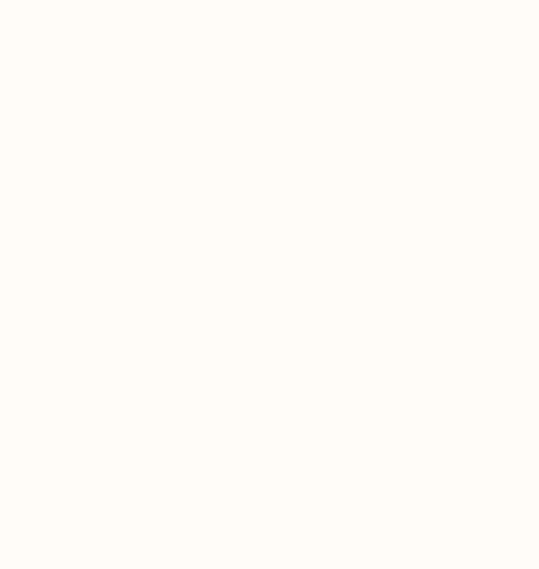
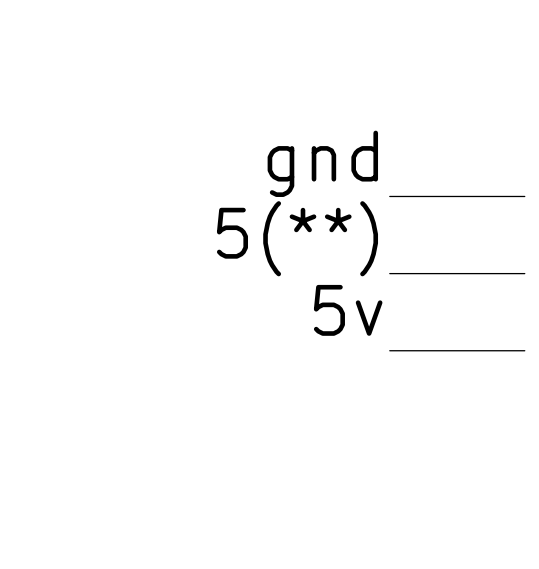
label: none -> gnd (322, 163)
wire: none -> (389, 196) (524, 196)
label: none -> 5(**) (297, 238)
wire: none -> (389, 273) (524, 273)
label: none -> 5v (348, 310)
wire: none -> (389, 350) (524, 350)

